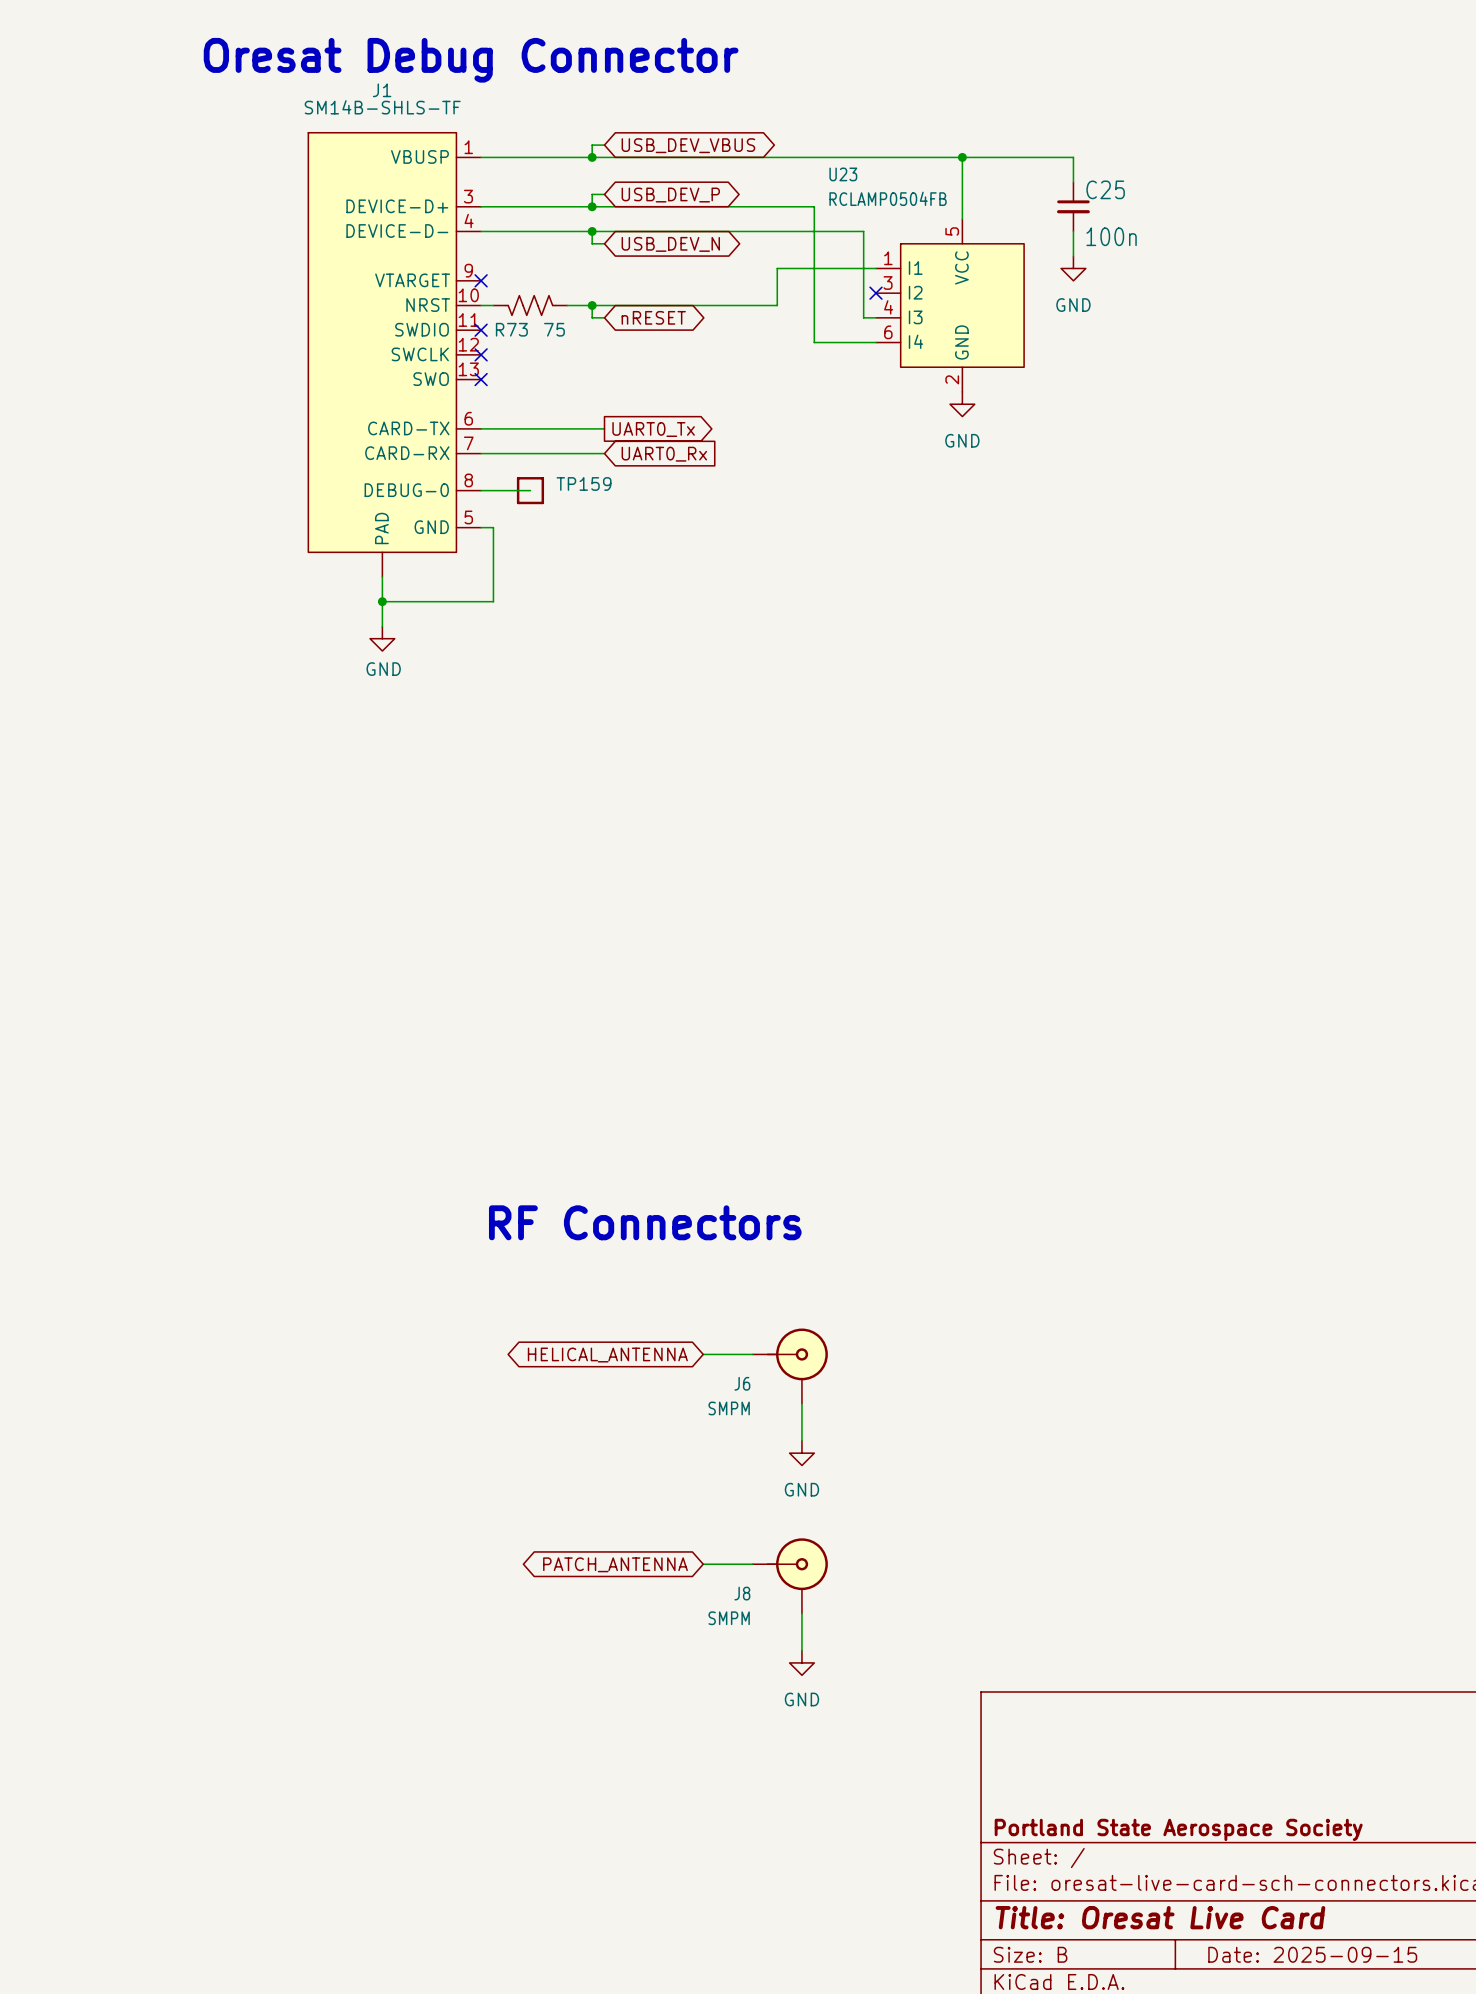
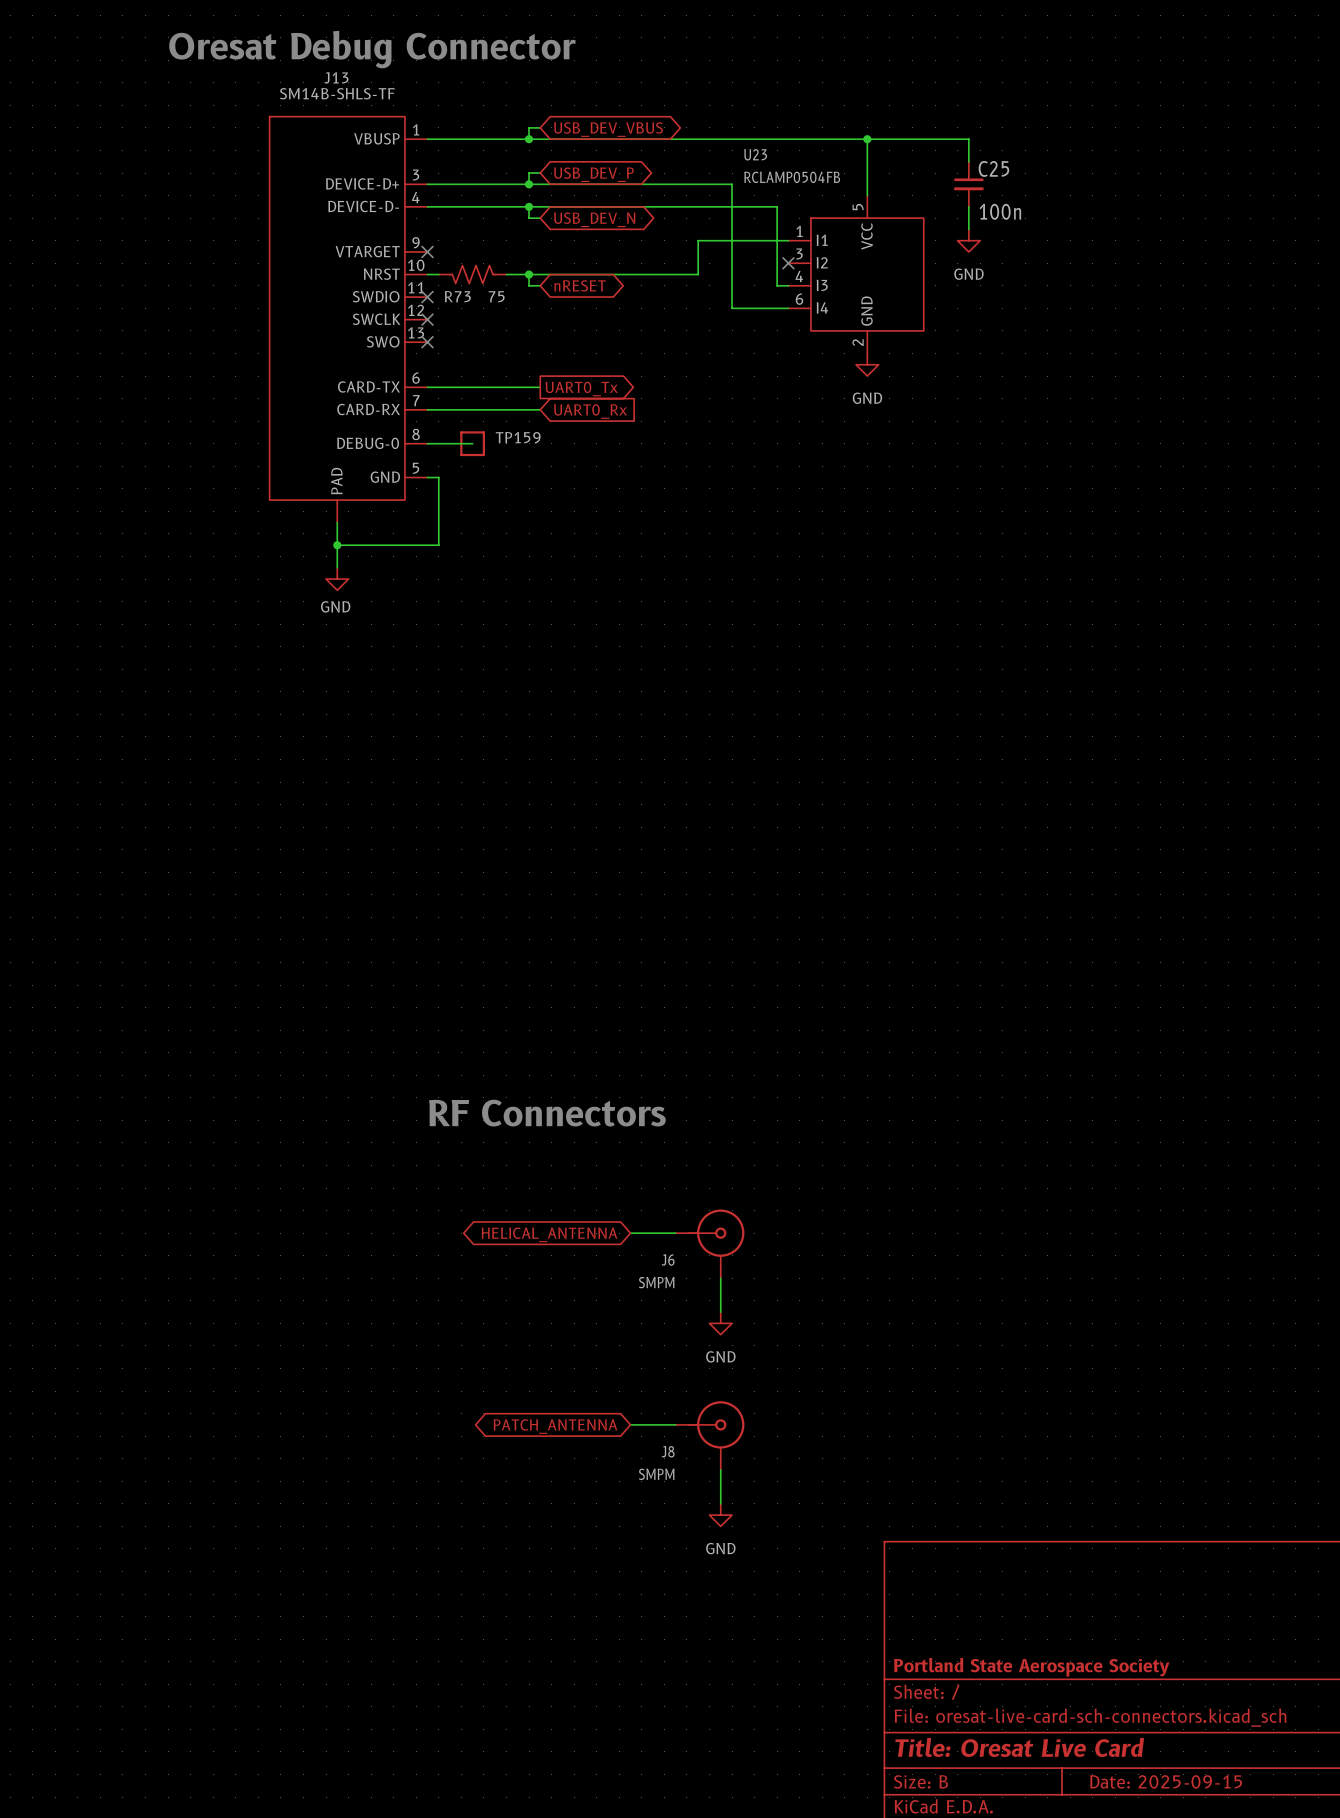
J1 name: J1 (382, 90) -> J13 (336, 77)

